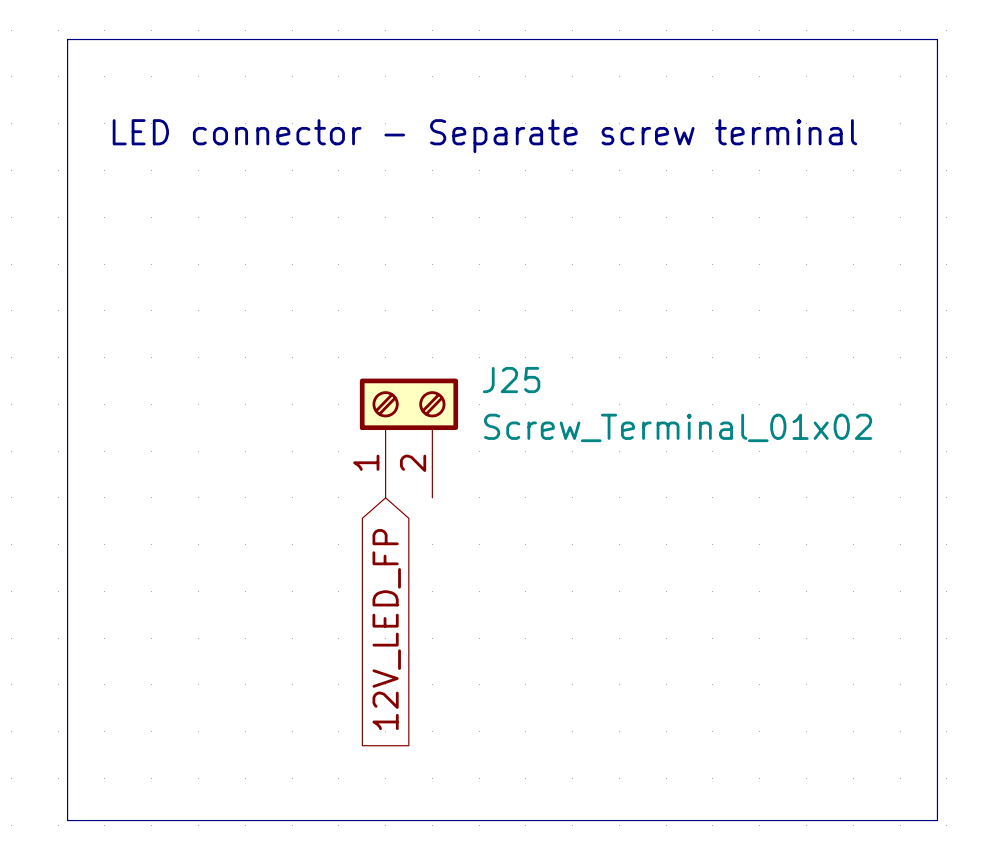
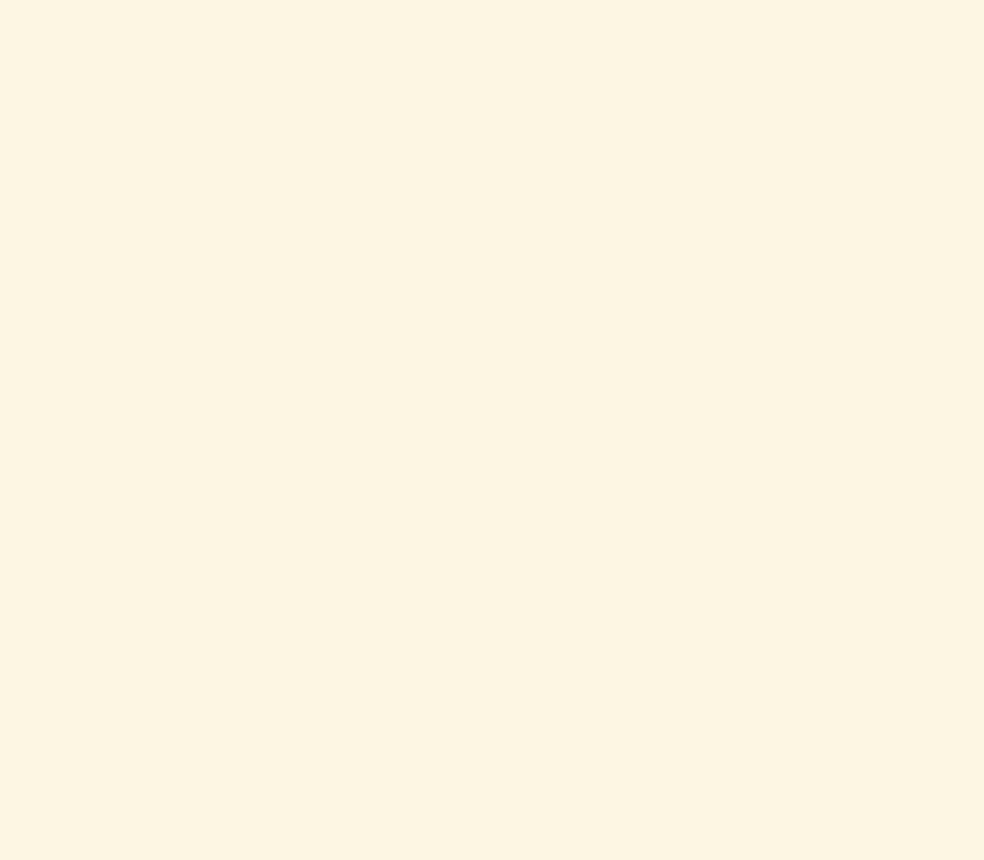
line: (67, 39) (937, 39) (937, 820) (67, 820) (67, 39) -> none
text: LED connector - Separate screw terminal (484, 136) -> none
J25: Screw_Terminal_01x02 (408, 438) -> none
global label: 12V_LED_FP (386, 629) -> none

